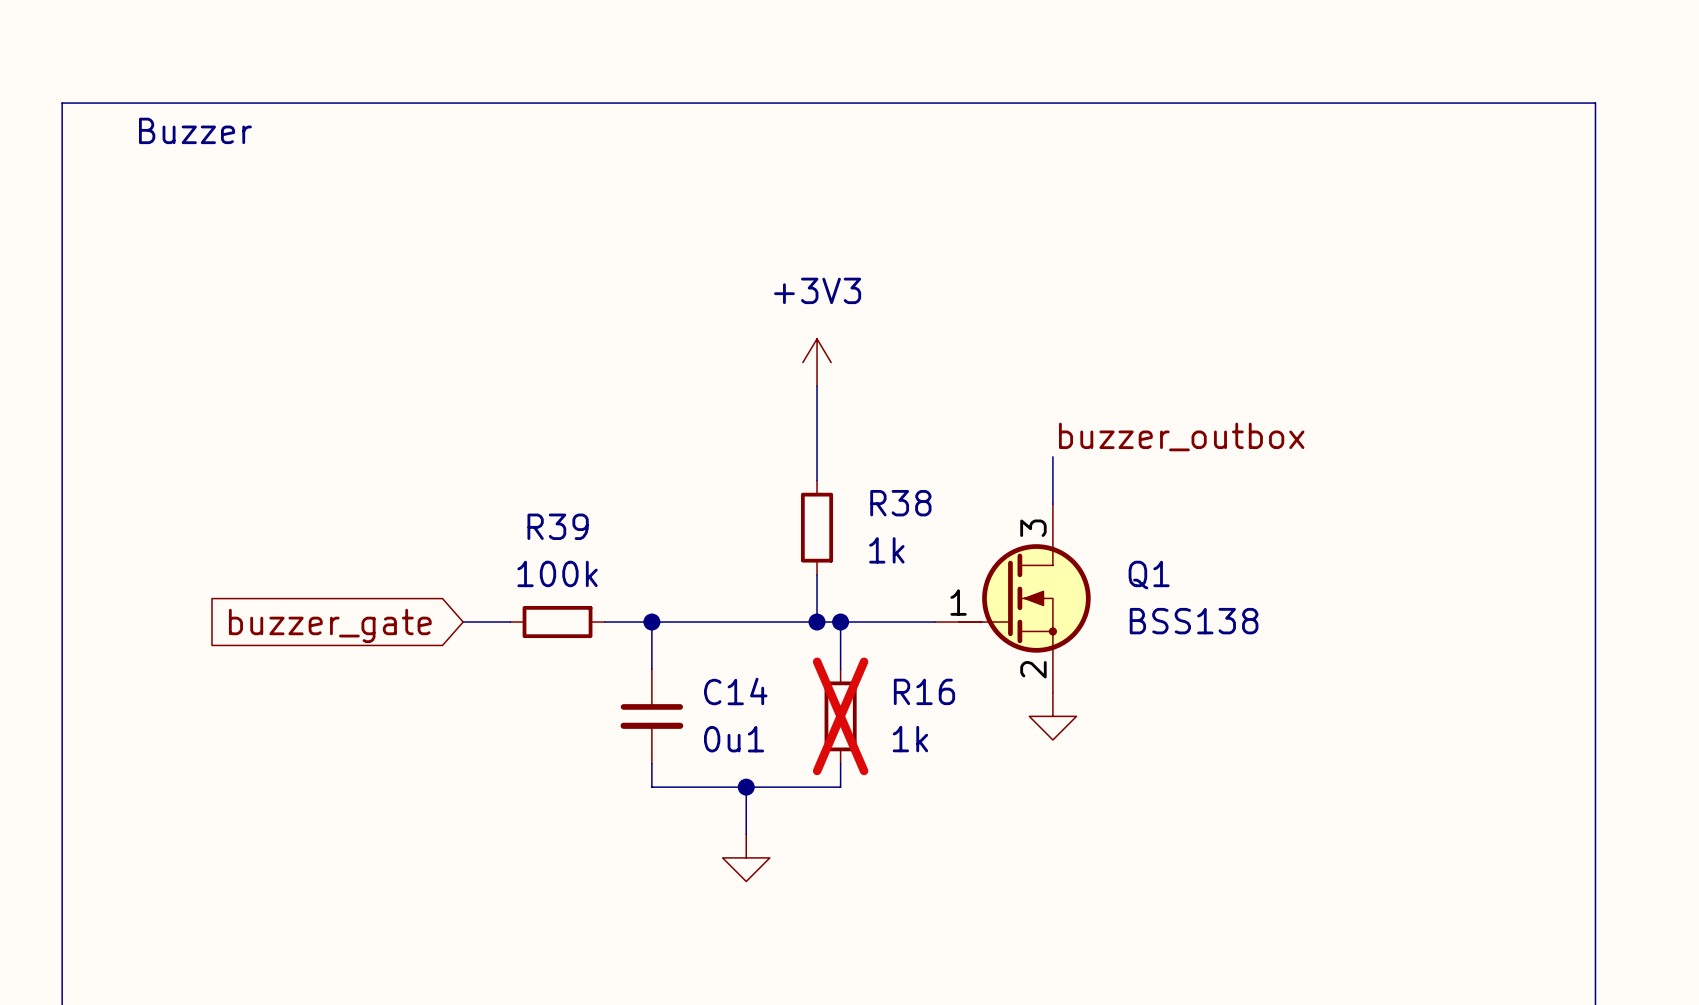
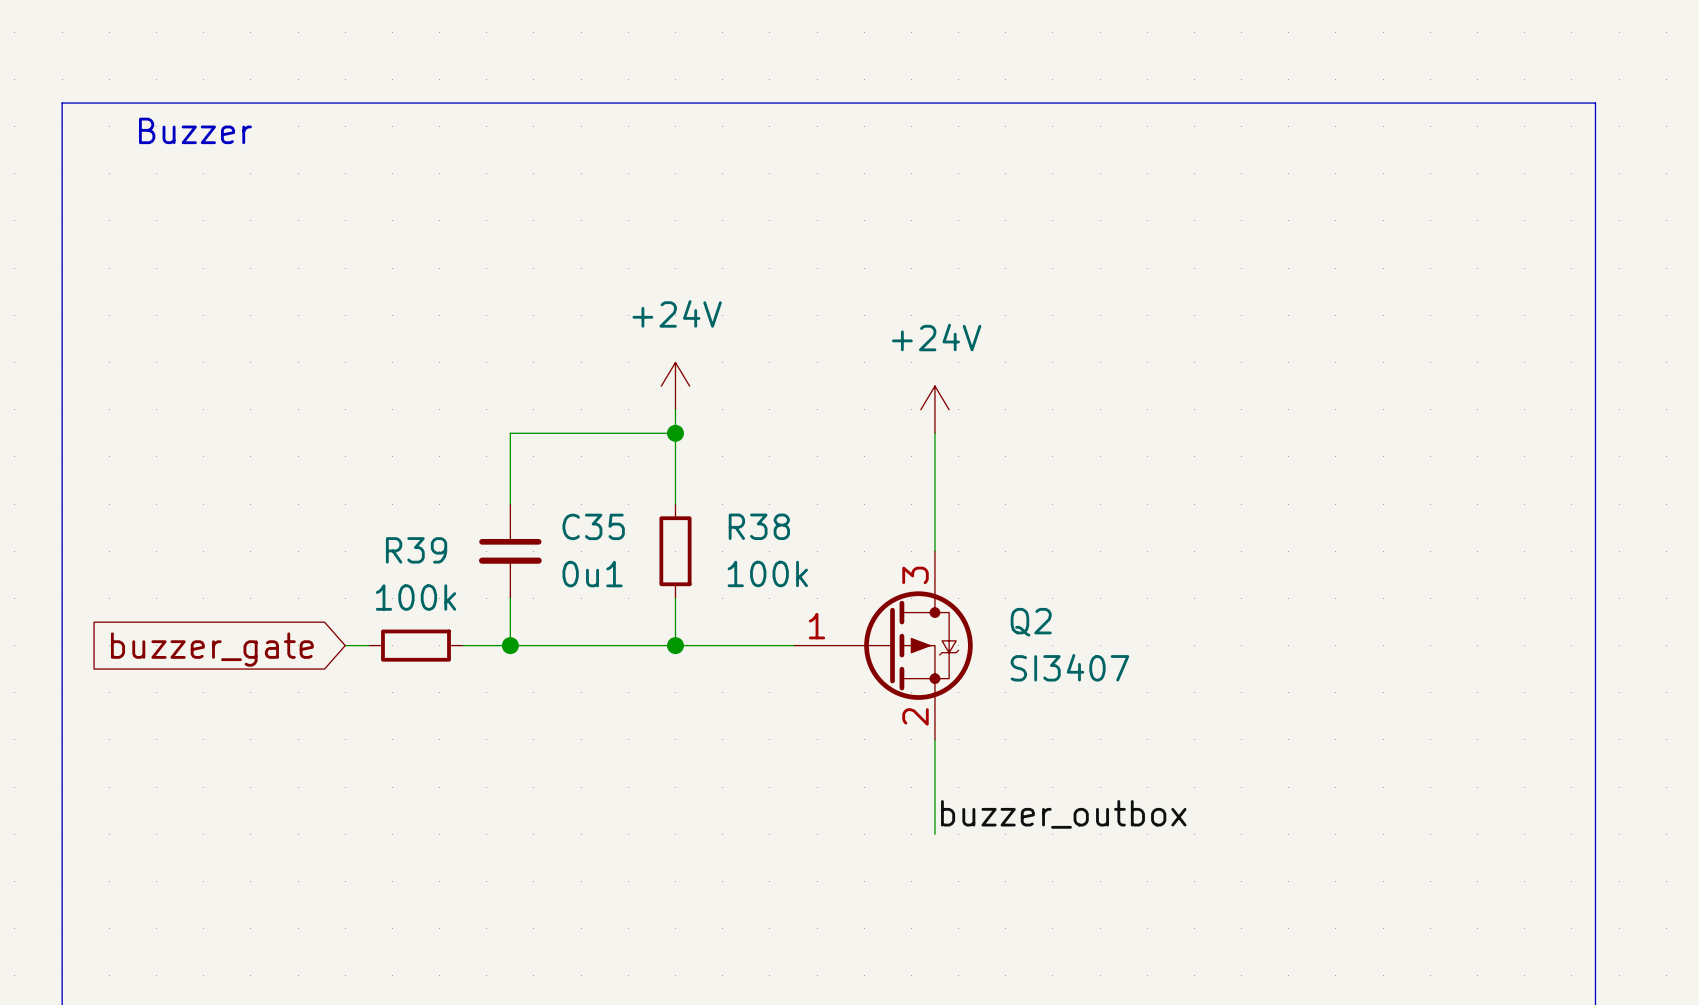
power symbol: +3V3 (817, 362) -> none
power symbol: none -> +24V (675, 386)
wire: (817, 386) (817, 480) -> (675, 409) (675, 504)
power symbol: none -> +24V (934, 409)
wire: none -> (675, 433) (510, 433) (510, 504)
junction: none -> (675, 433)
wire: none -> (934, 433) (934, 551)
label position: buzzer_outbox (1181, 436) -> buzzer_outbox (1063, 814)
wire: (1052, 456) (1052, 504) -> none
R38 position: (817, 527) -> (675, 551)
R38 value: 1k (886, 550) -> 100k (767, 573)
C35: none -> 0u1 (510, 551)
wire: (817, 574) (817, 622) -> (675, 598) (675, 645)
Q1: BSS138 (1012, 598) -> none
wire: (463, 622) (510, 622) -> none
R39 position: (557, 622) -> (415, 645)
wire: (604, 622) (934, 622) -> (463, 645) (793, 645)
wire: (651, 622) (651, 669) -> (510, 598) (510, 645)
junction position: (651, 622) -> (675, 645)
junction: (817, 622) -> none
wire: (840, 622) (840, 669) -> none
junction: (840, 622) -> none
global label position: buzzer_gate (330, 625) -> buzzer_gate (212, 649)
junction: none -> (510, 645)
Q2: none -> SI3407 (883, 645)
C14: 0u1 (651, 716) -> none
R16: 1k (840, 716) -> none
power symbol: (1052, 716) -> none
wire: none -> (934, 739) (934, 834)
wire: (651, 763) (651, 787) (840, 787) (840, 763) -> none
wire: (746, 787) (746, 834) -> none
junction: (746, 787) -> none
power symbol: (746, 857) -> none

